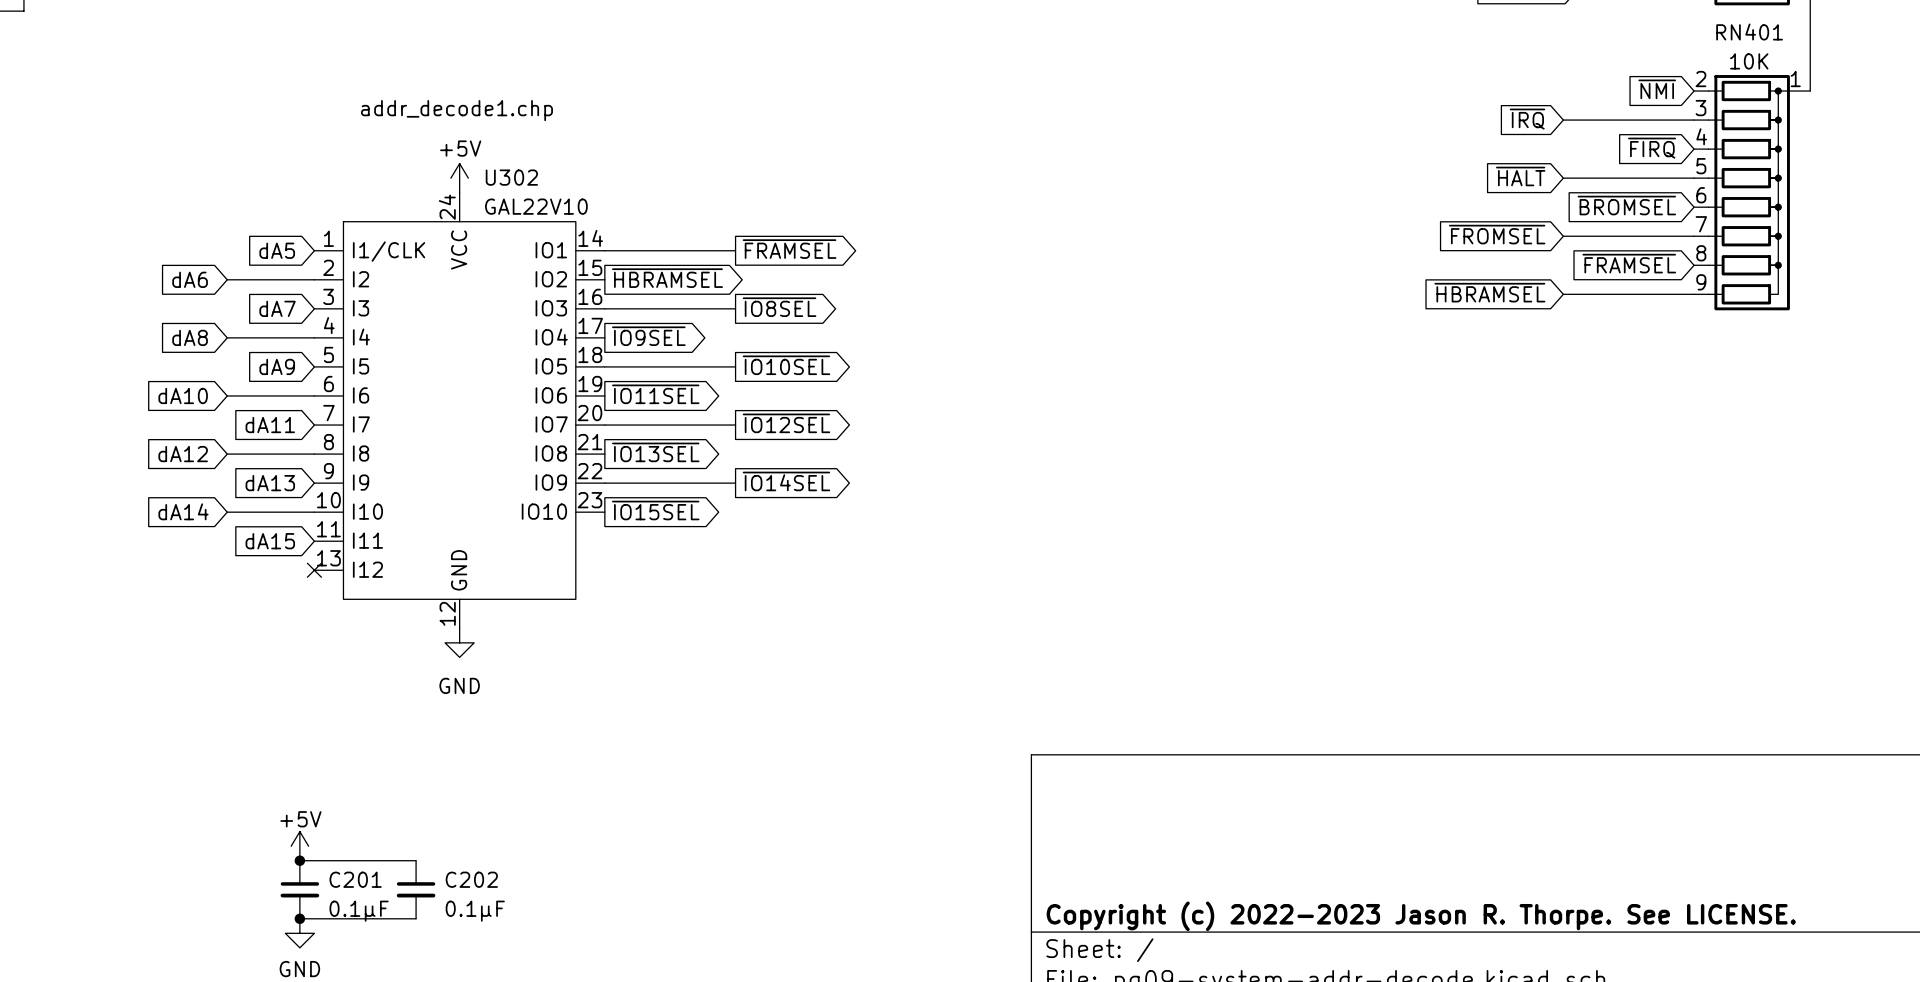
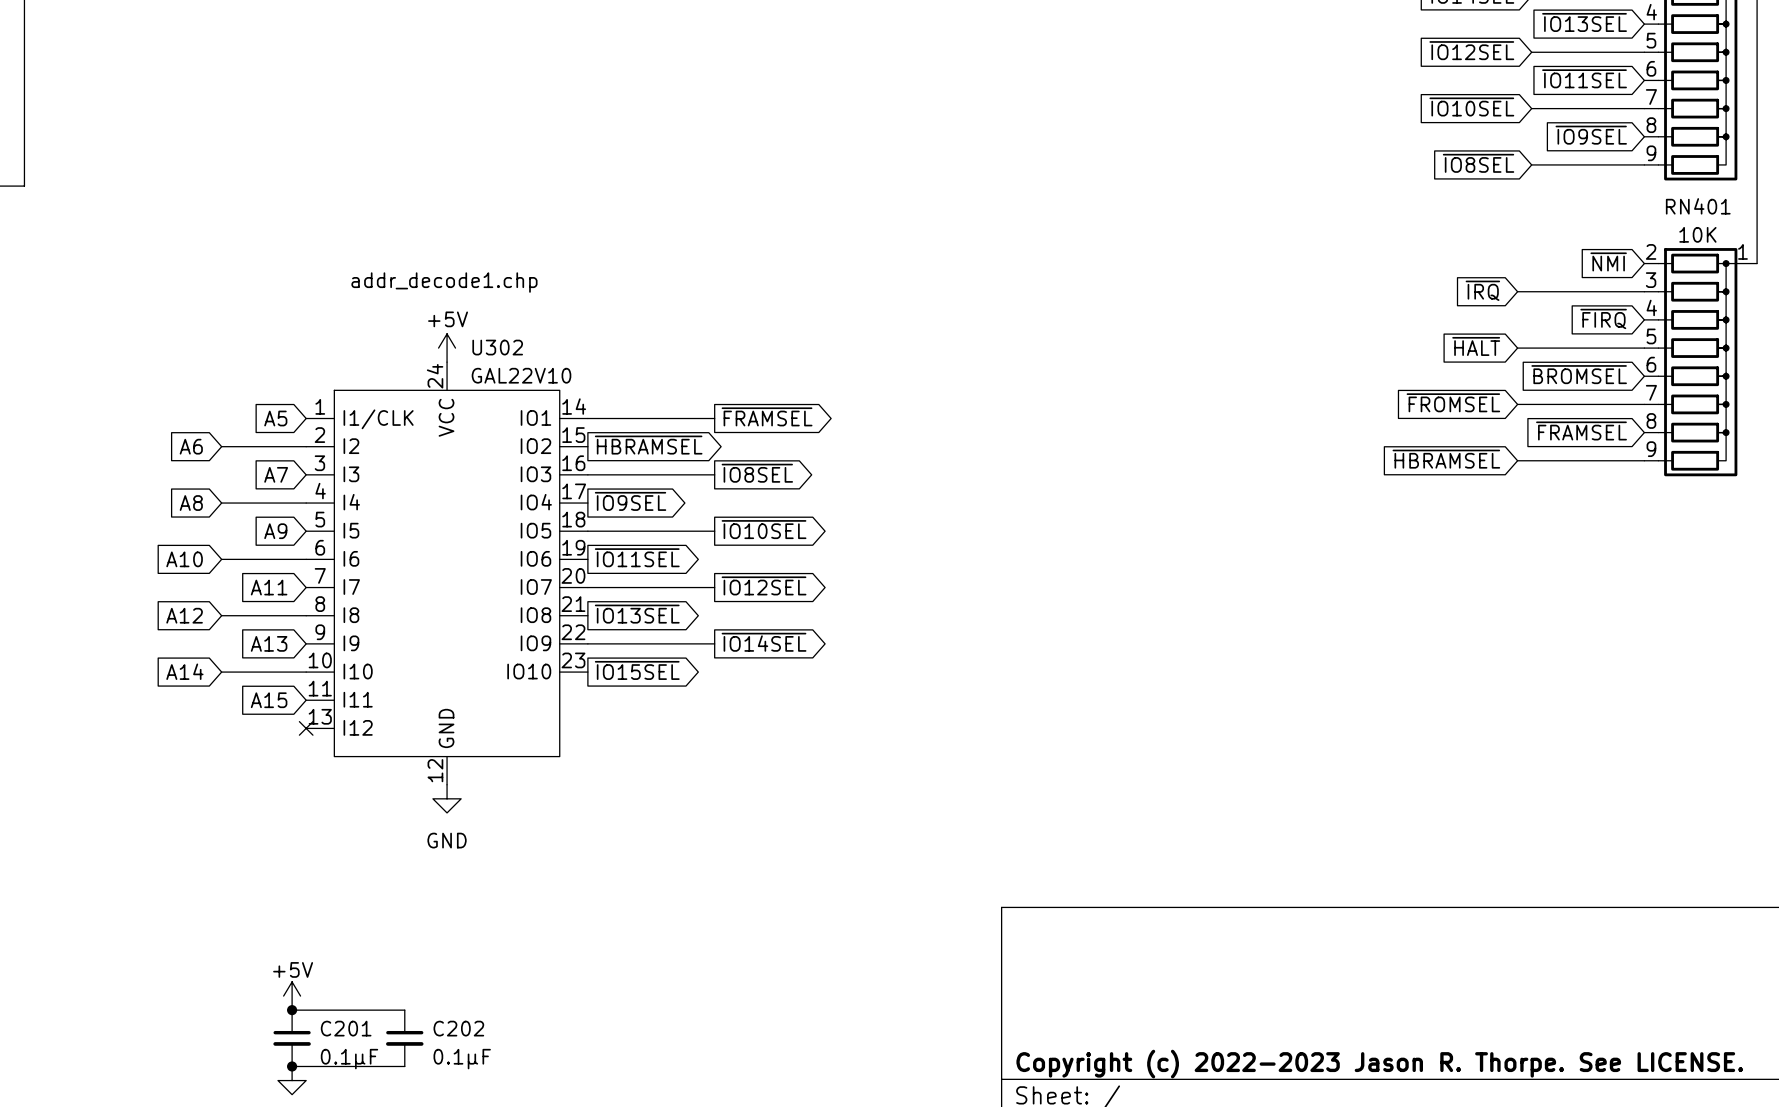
global label: dA5 (277, 250) -> A5 (275, 418)
global label: dA6 (190, 279) -> A6 (191, 446)
global label: dA7 (277, 308) -> A7 (276, 474)
global label: dA8 (190, 337) -> A8 (191, 503)
global label: dA9 (277, 366) -> A9 (275, 531)
global label: dA10 (183, 395) -> A10 (184, 559)
global label: dA11 (270, 425) -> A11 (269, 587)
global label: dA12 (183, 454) -> A12 (184, 615)
global label: dA13 (270, 483) -> A13 (269, 643)
global label: dA14 (183, 511) -> A14 (184, 671)
global label: dA15 (270, 541) -> A15 (269, 700)

